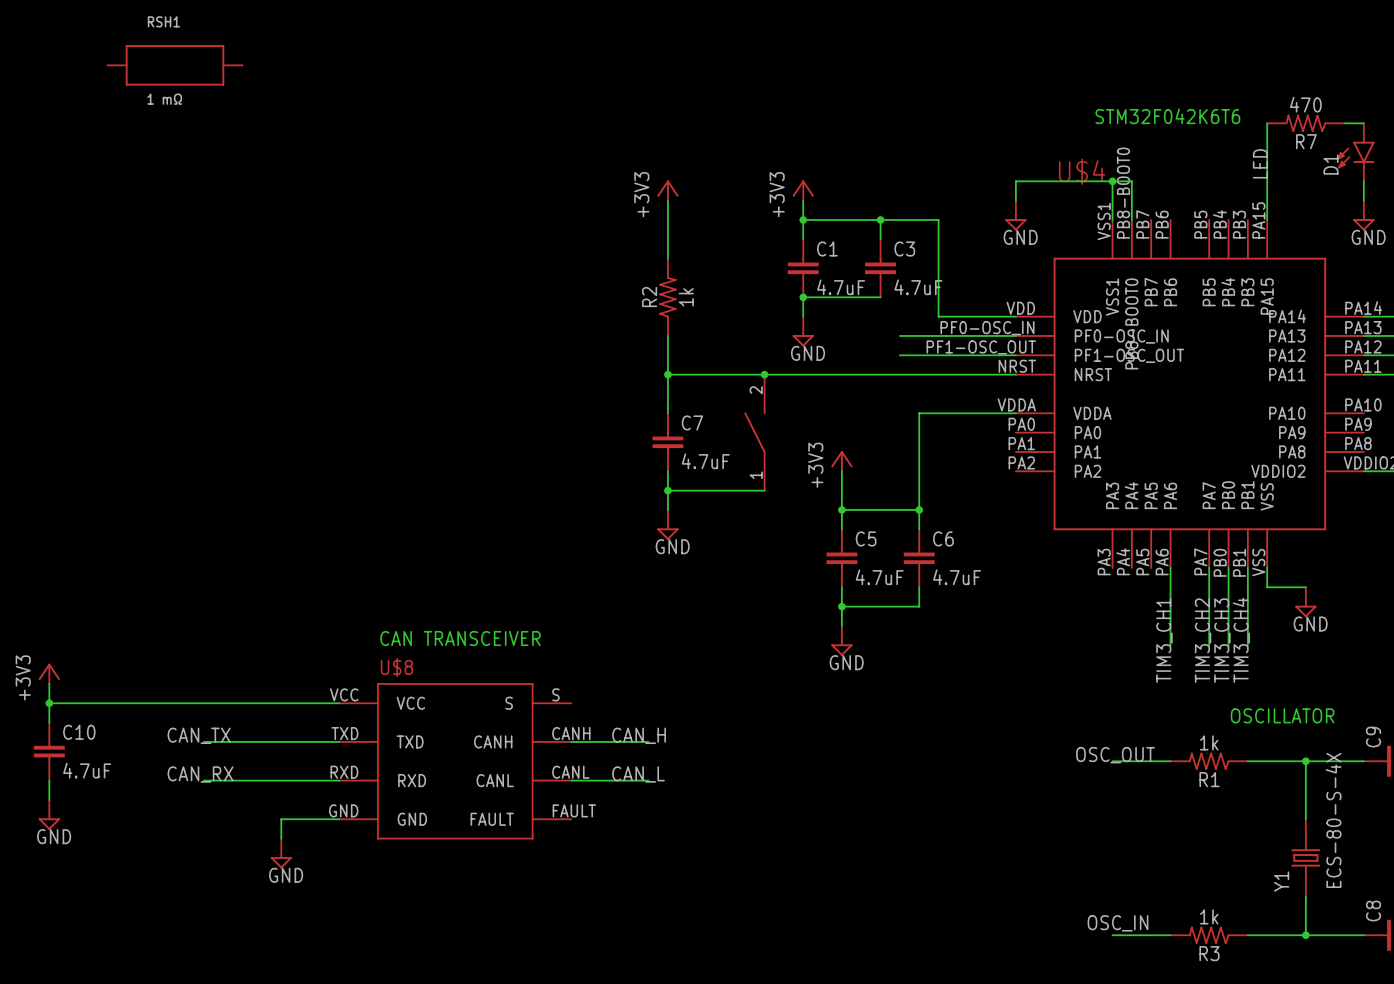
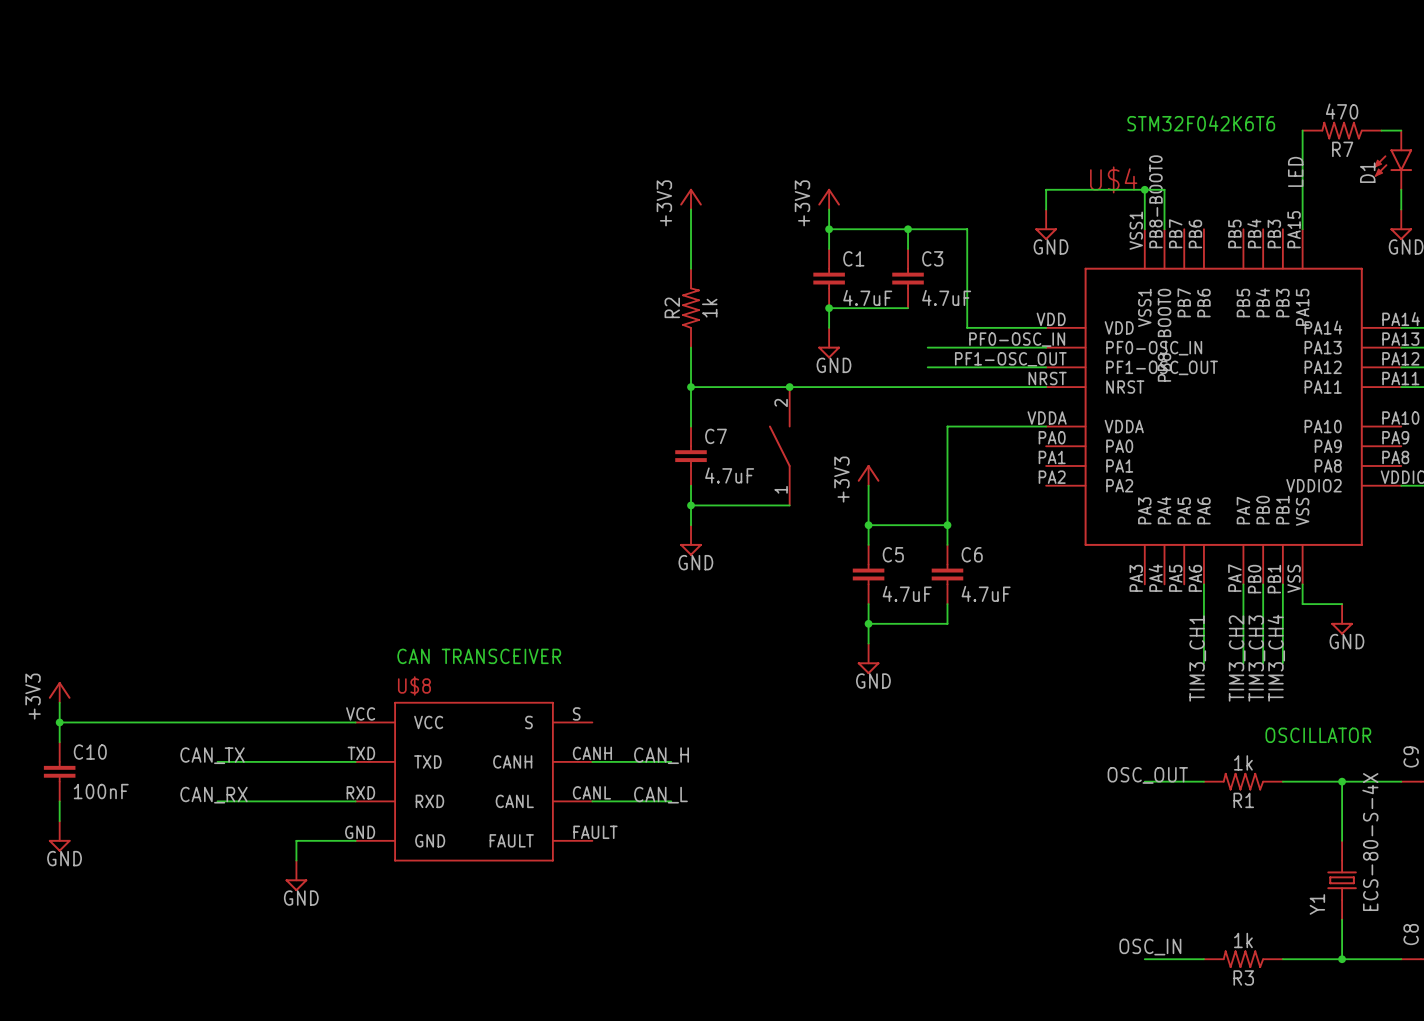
RSH1: 1 mΩ (174, 65) -> none
C10 value: 4.7uF (87, 770) -> 100nF (101, 791)

